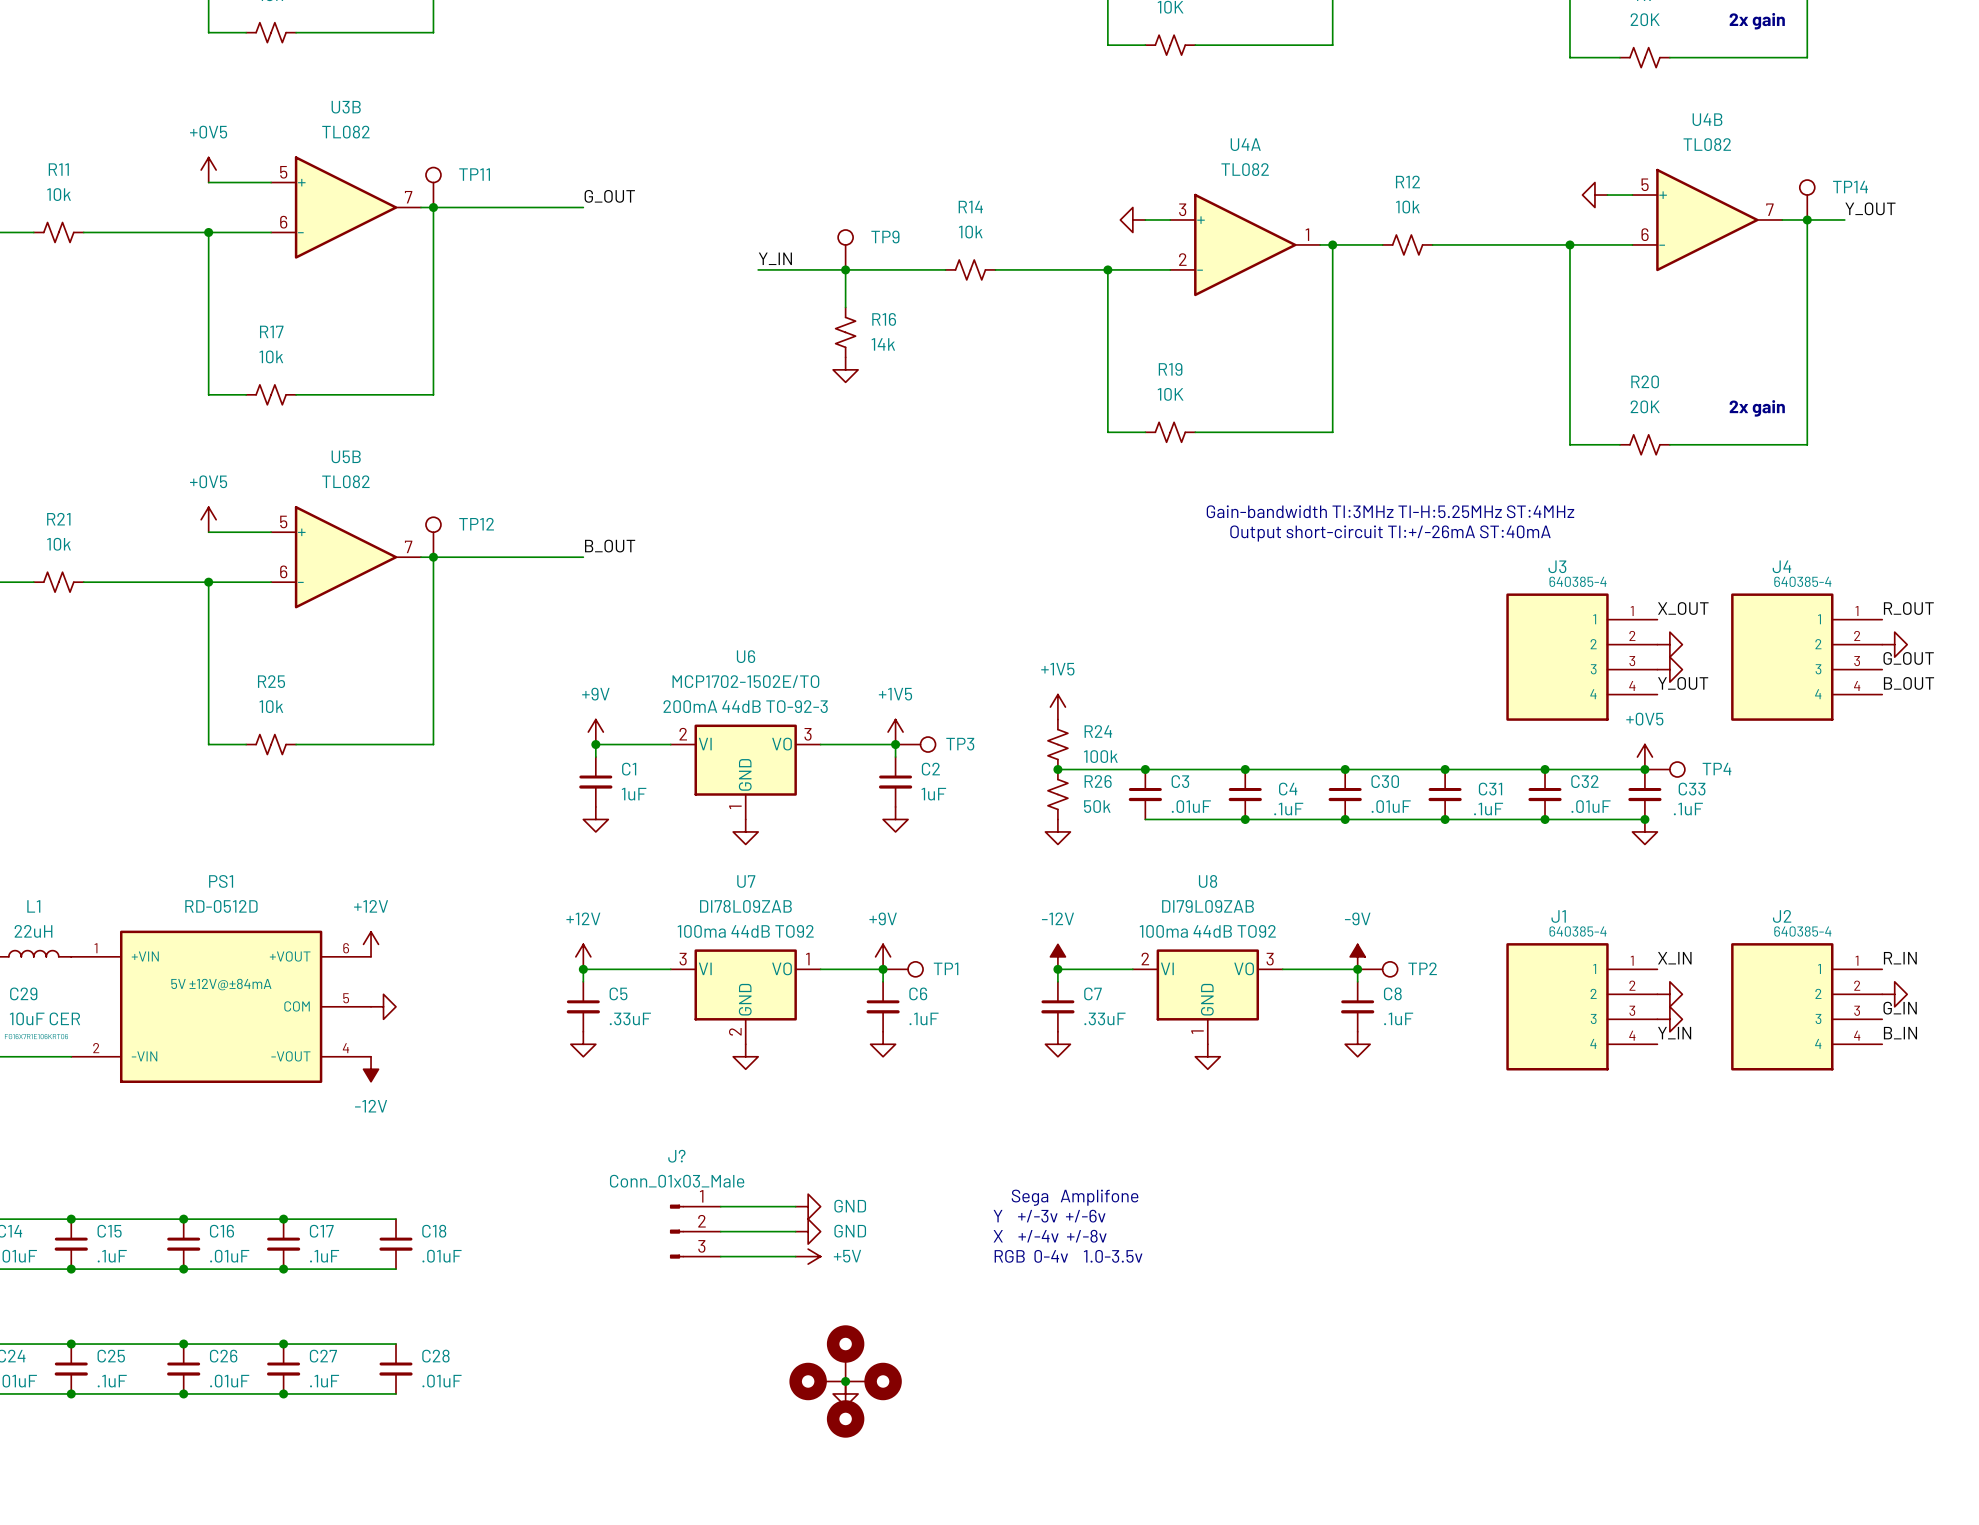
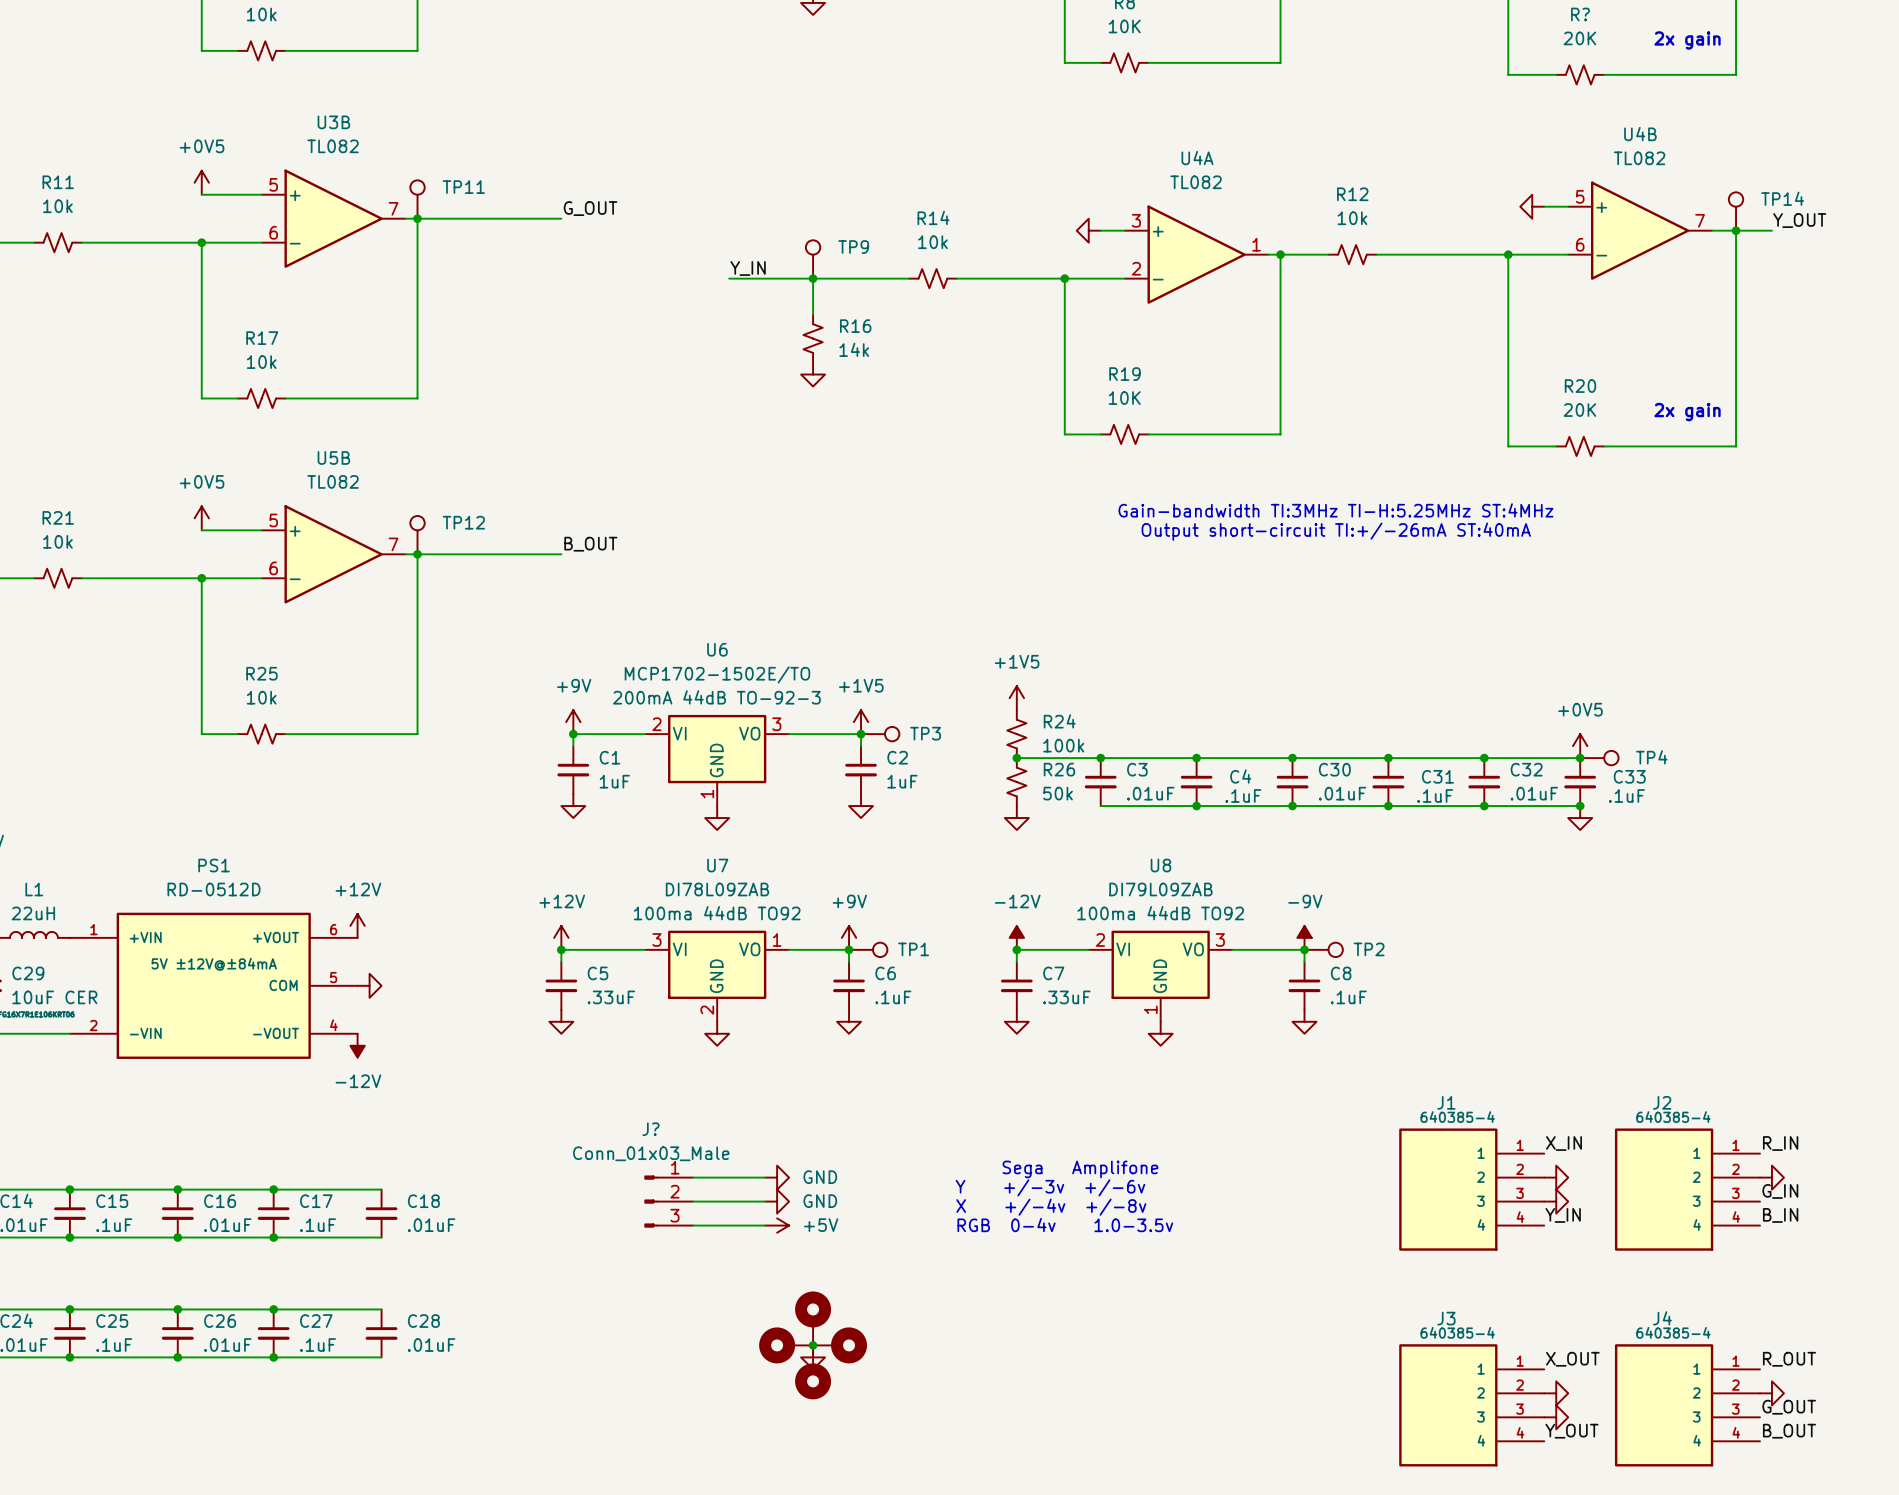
label: X_OUT (1683, 608) -> none
label: R_OUT (1908, 608) -> none
power symbol: (1669, 644) -> none
power symbol: (1894, 644) -> none
J3 position: (1581, 657) -> (1471, 1405)
J4 position: (1806, 657) -> (1687, 1405)
label: G_OUT (1908, 658) -> none
power symbol: (1669, 669) -> none
label: Y_OUT (1683, 683) -> none
label: B_OUT (1908, 683) -> none
label position: X_IN (1674, 958) -> X_IN (1564, 1143)
label position: R_IN (1900, 958) -> R_IN (1780, 1143)
power symbol: (1669, 994) -> none
power symbol: (1894, 994) -> none
J1 position: (1581, 1006) -> (1471, 1189)
J2 position: (1806, 1006) -> (1687, 1189)
label position: G_IN (1900, 1008) -> G_IN (1780, 1191)
power symbol: (1669, 1019) -> none
label position: Y_IN (1674, 1033) -> Y_IN (1563, 1215)
label position: B_IN (1900, 1033) -> B_IN (1780, 1215)
power symbol: none -> (1556, 1177)
power symbol: none -> (1771, 1177)
power symbol: none -> (1556, 1201)
label: none -> X_OUT (1572, 1359)
label: none -> R_OUT (1789, 1359)
power symbol: none -> (1556, 1393)
power symbol: none -> (1771, 1393)
label: none -> G_OUT (1789, 1407)
power symbol: none -> (1556, 1417)
label: none -> Y_OUT (1572, 1431)
label: none -> B_OUT (1789, 1431)

